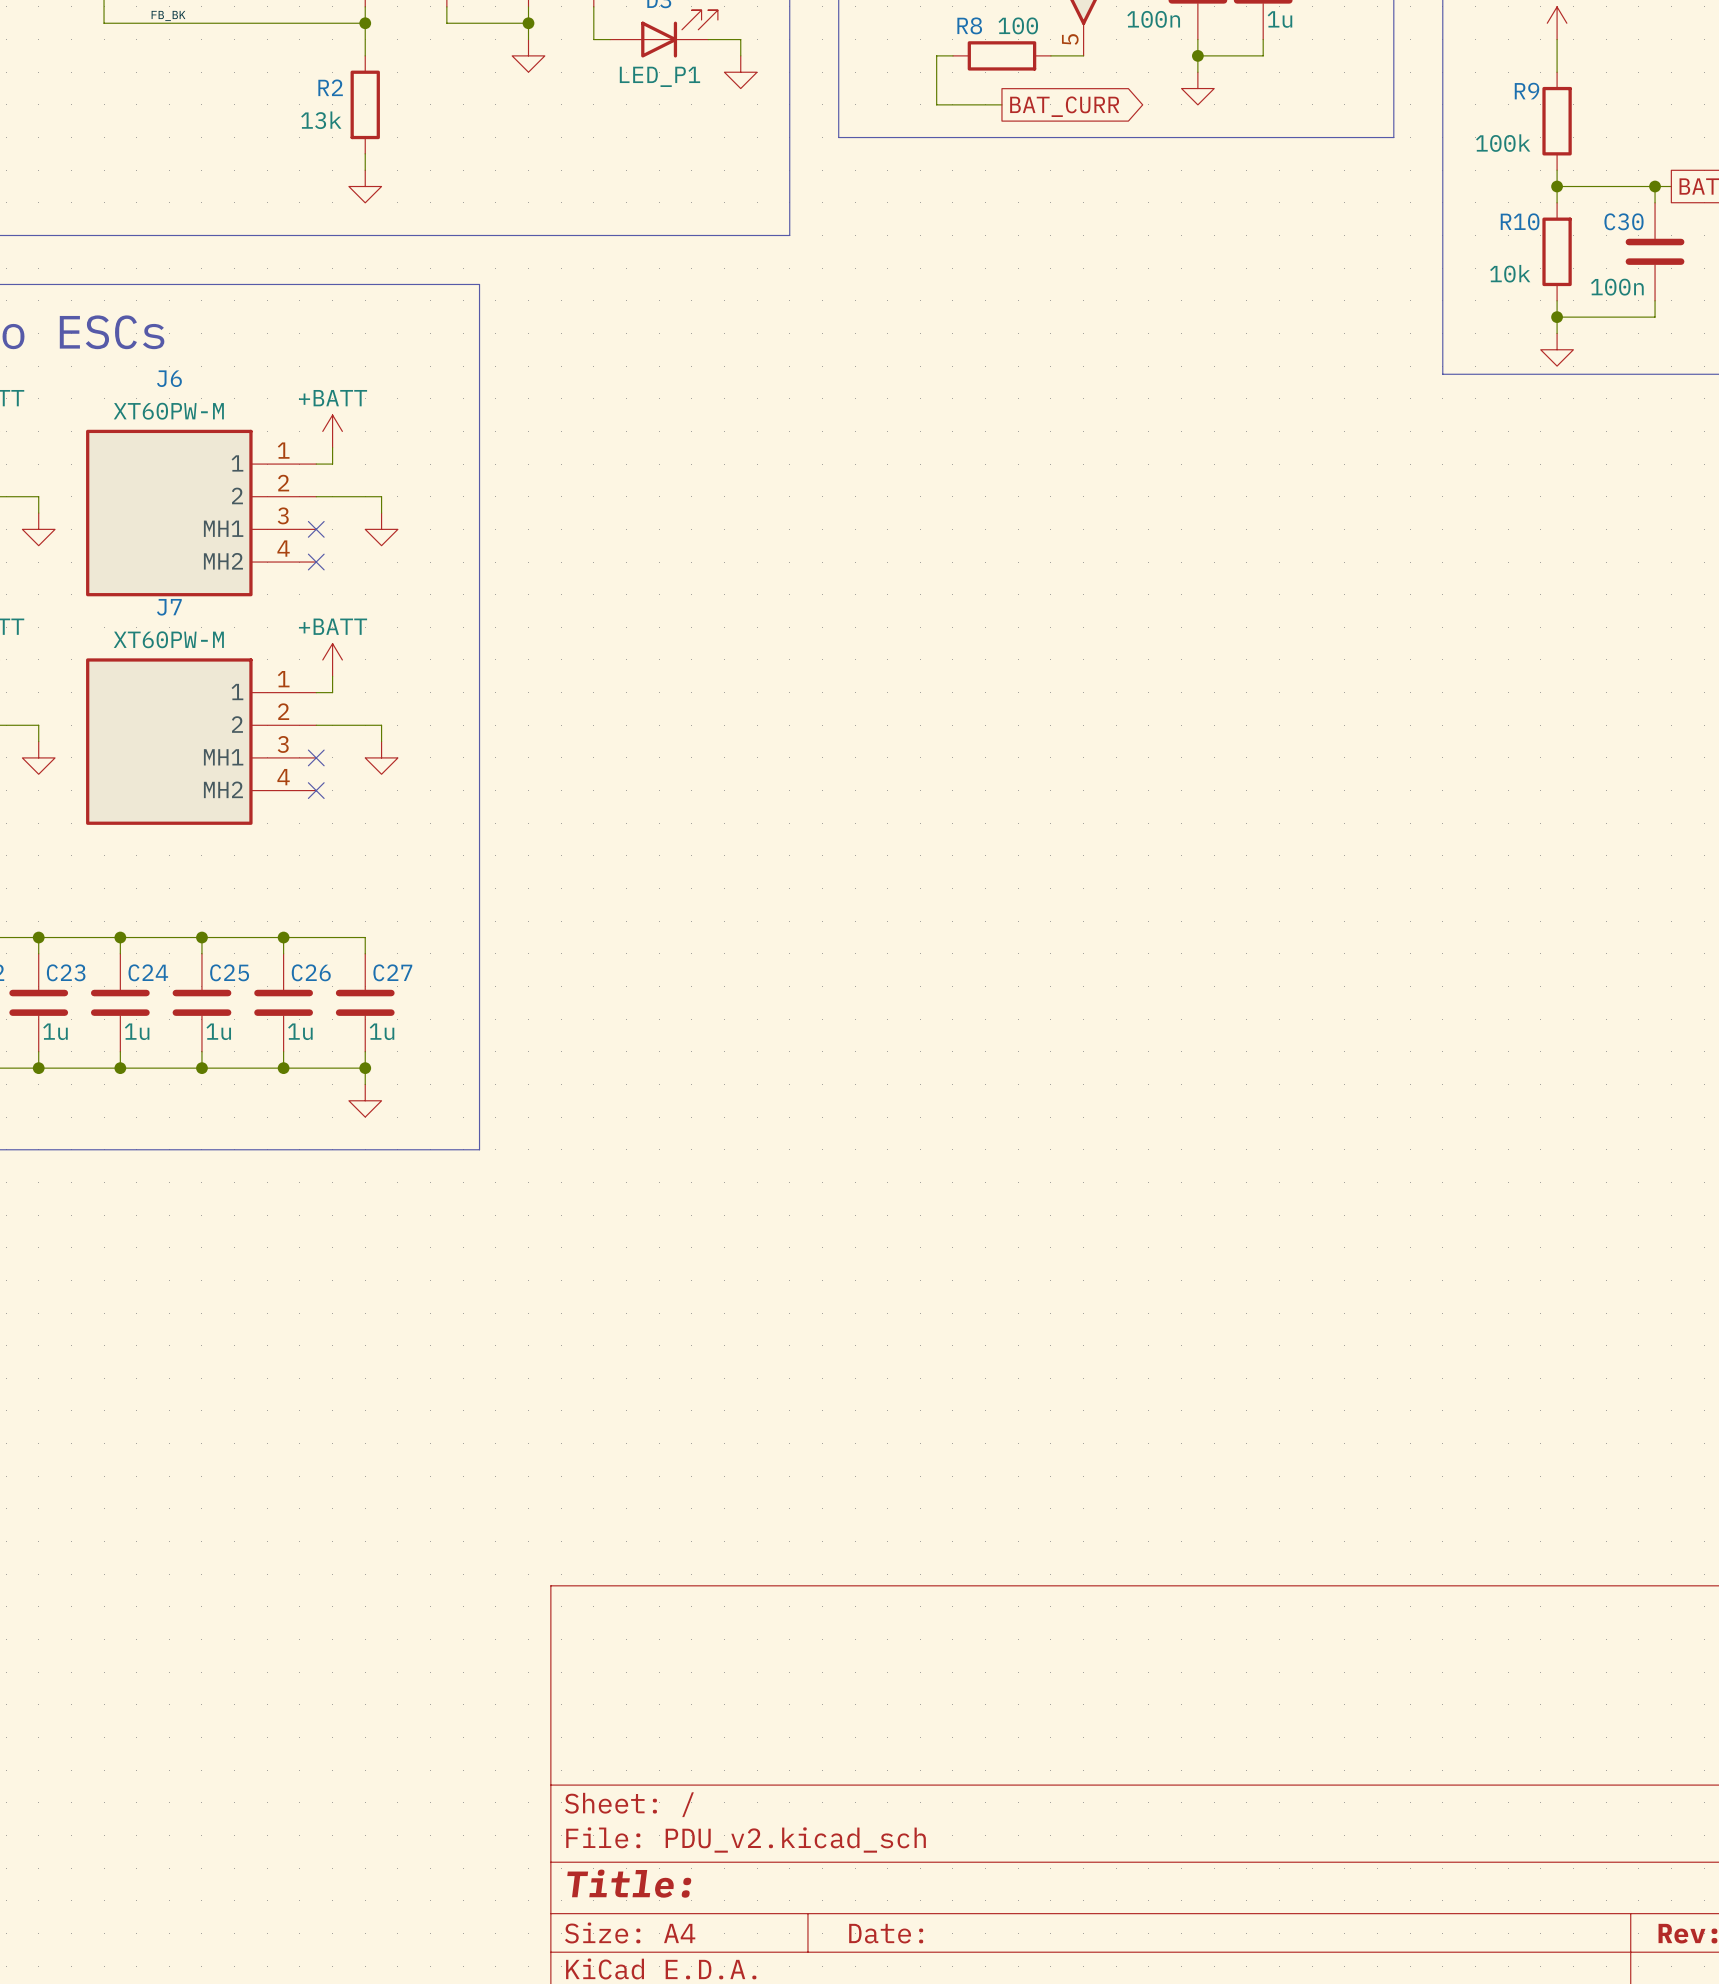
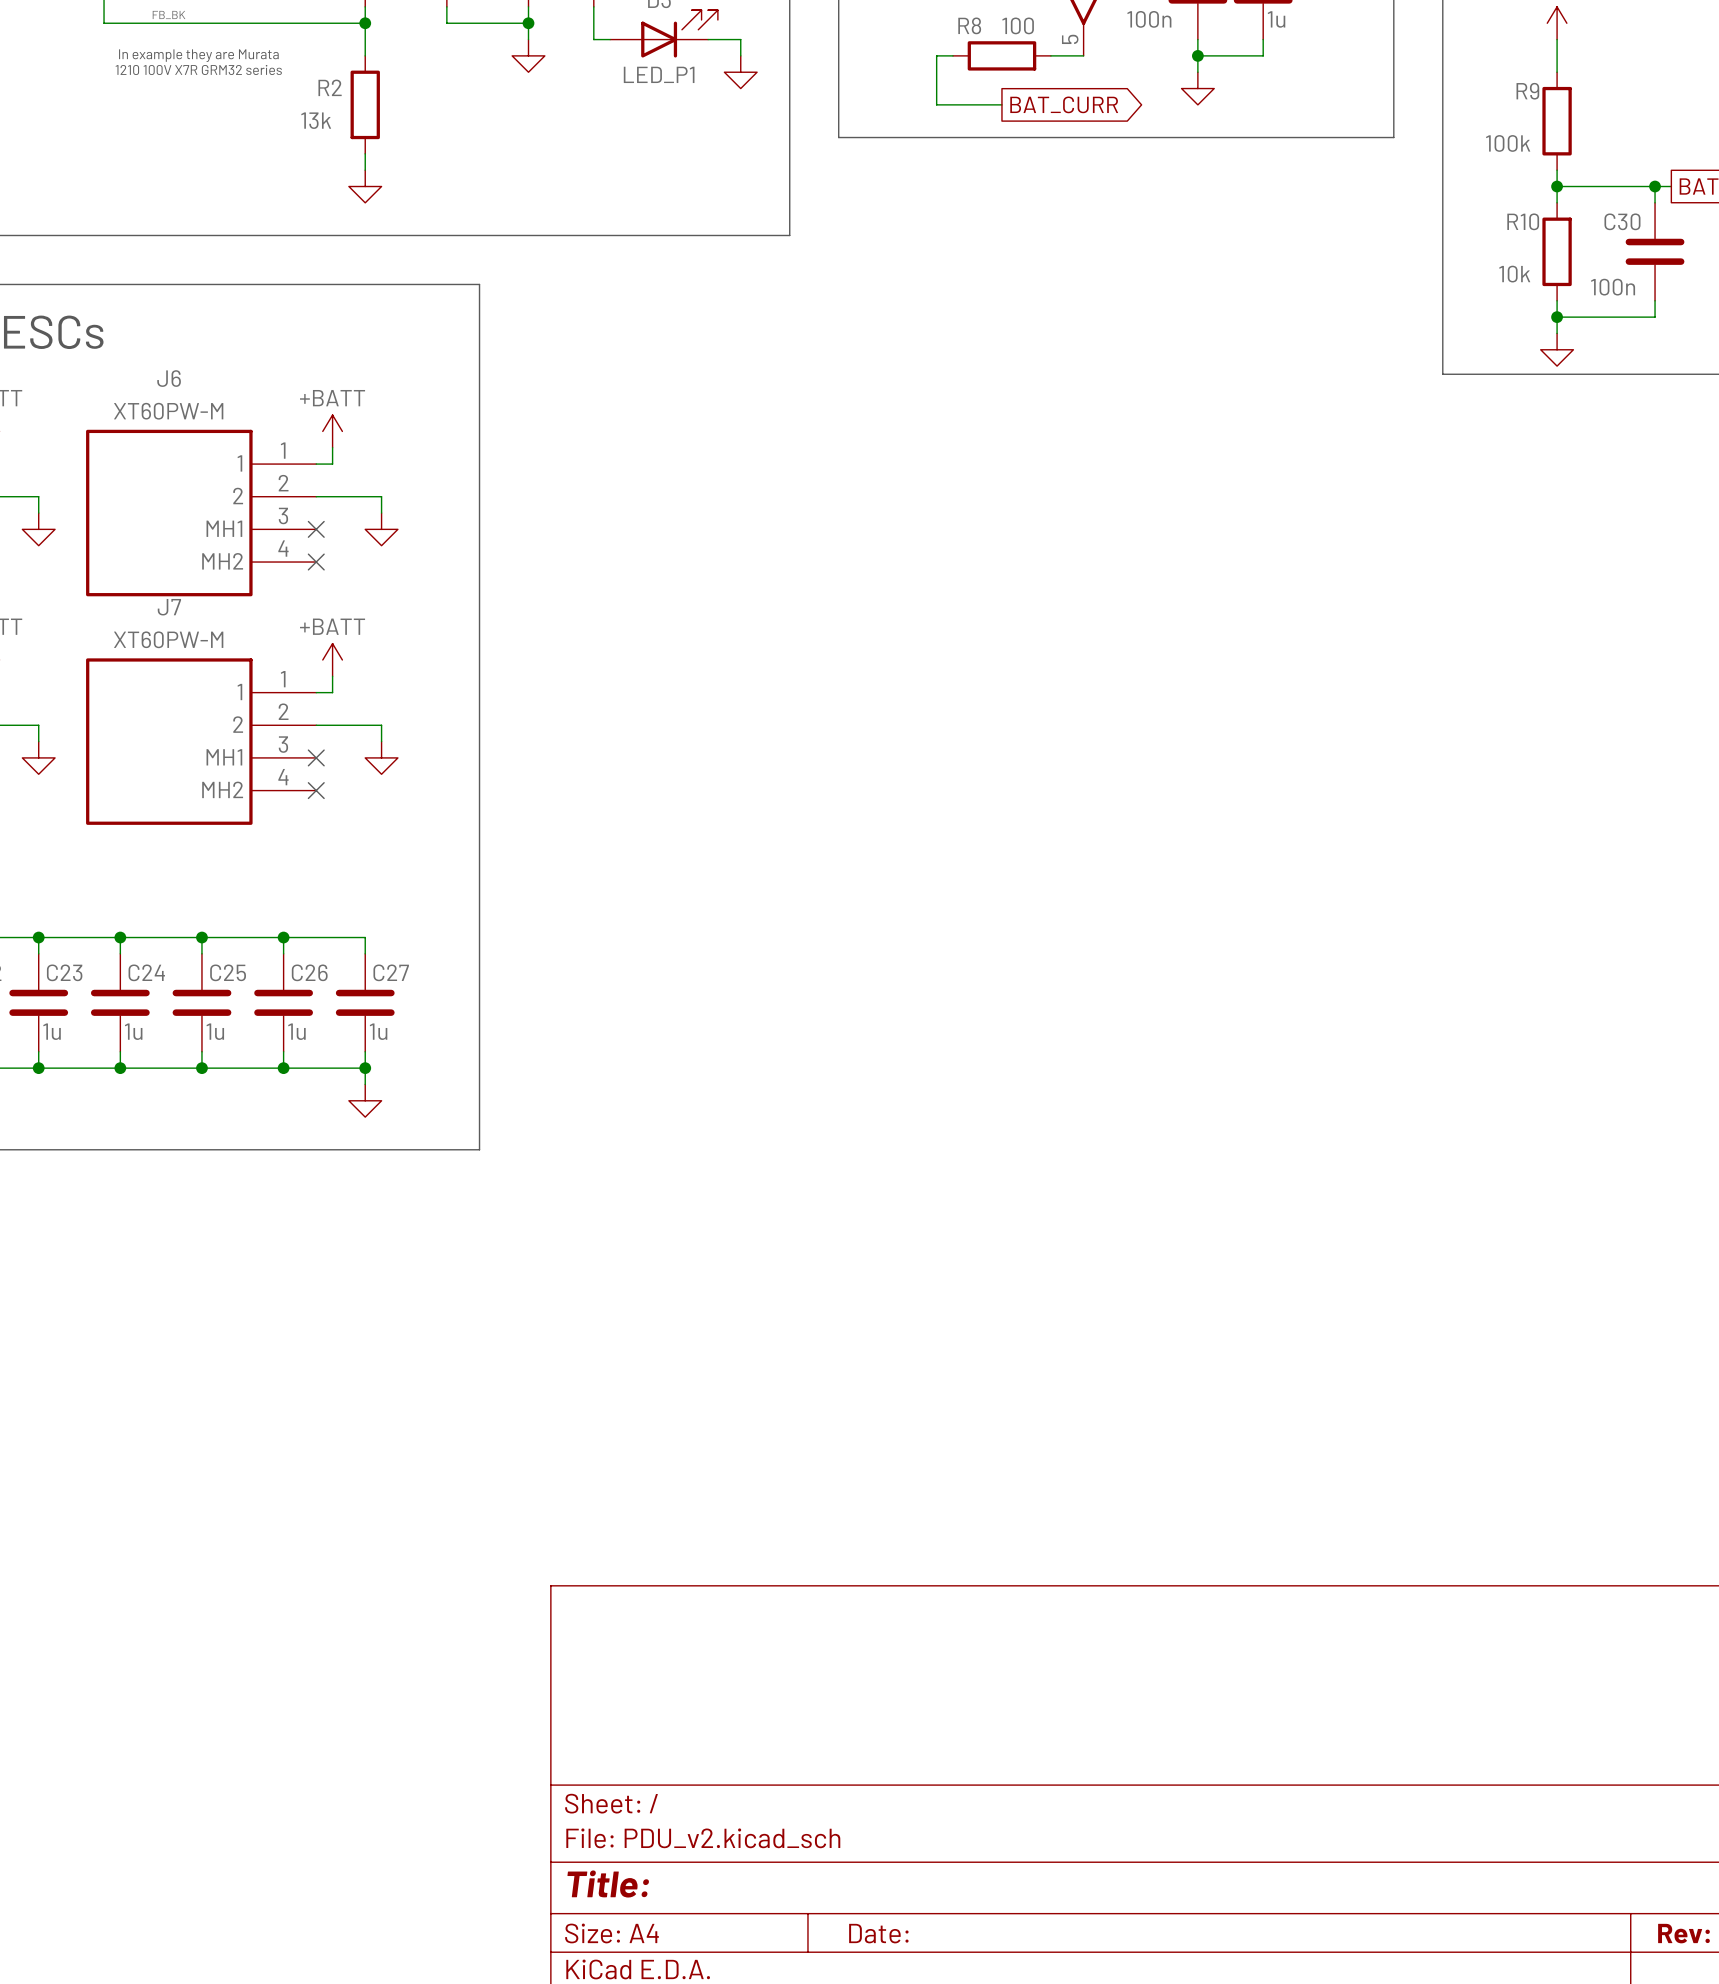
text: none -> In example they are Murata (198, 55)
text: none -> 1210 100V X7R GRM32 series (198, 70)

